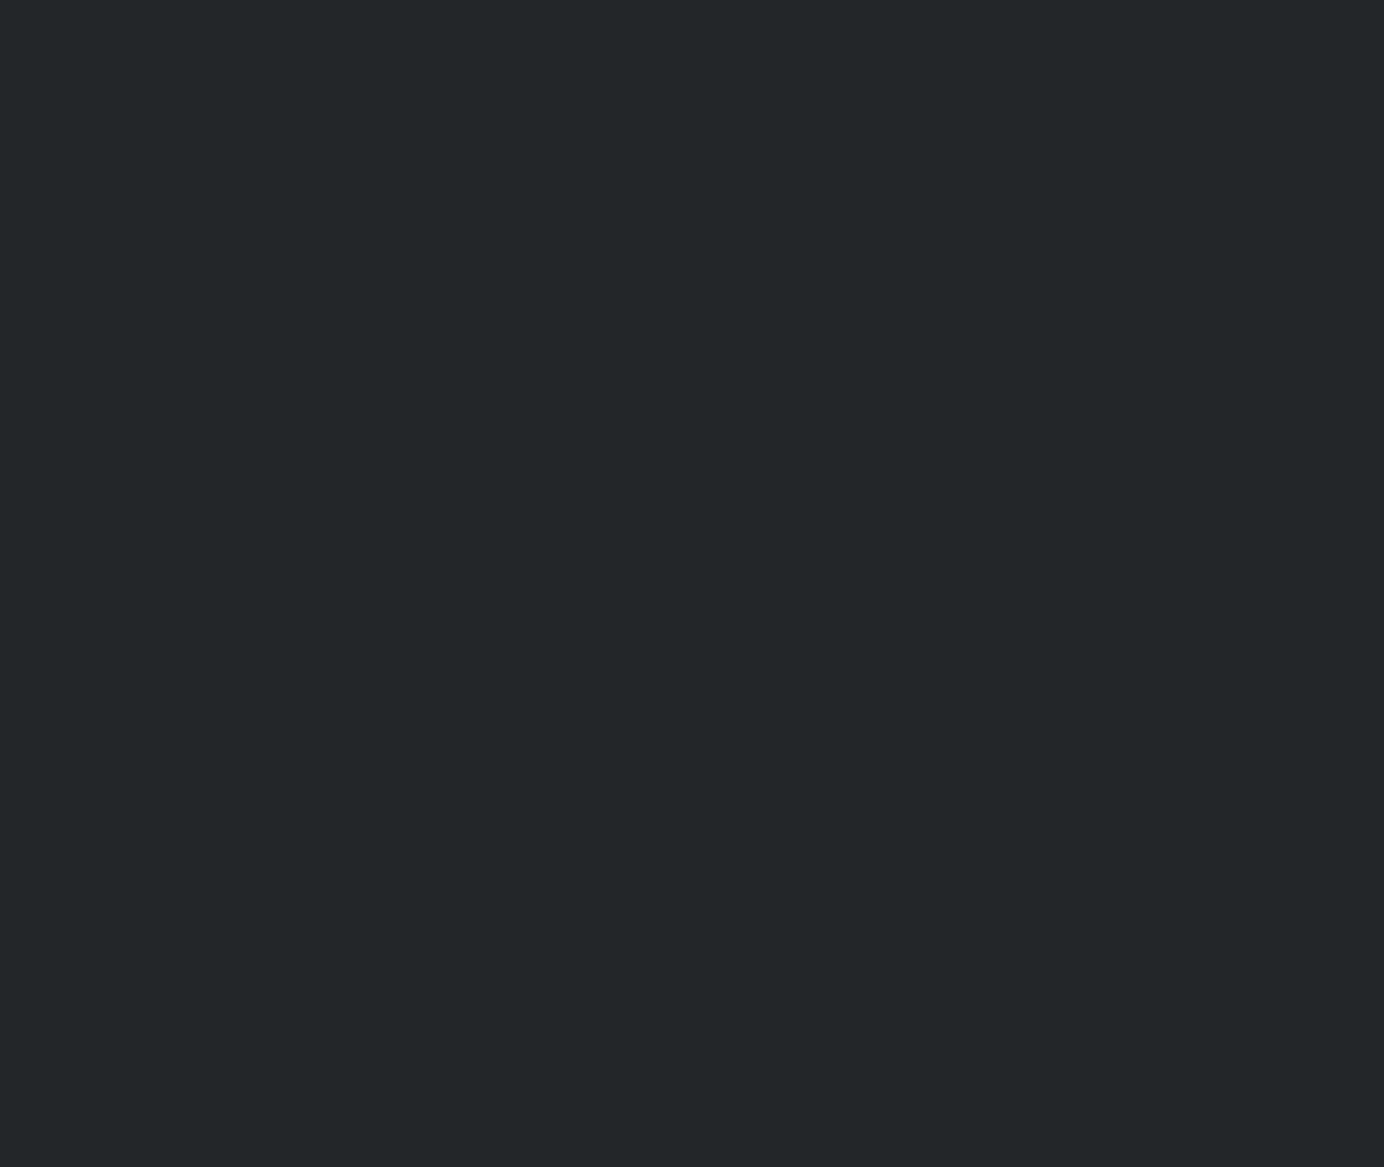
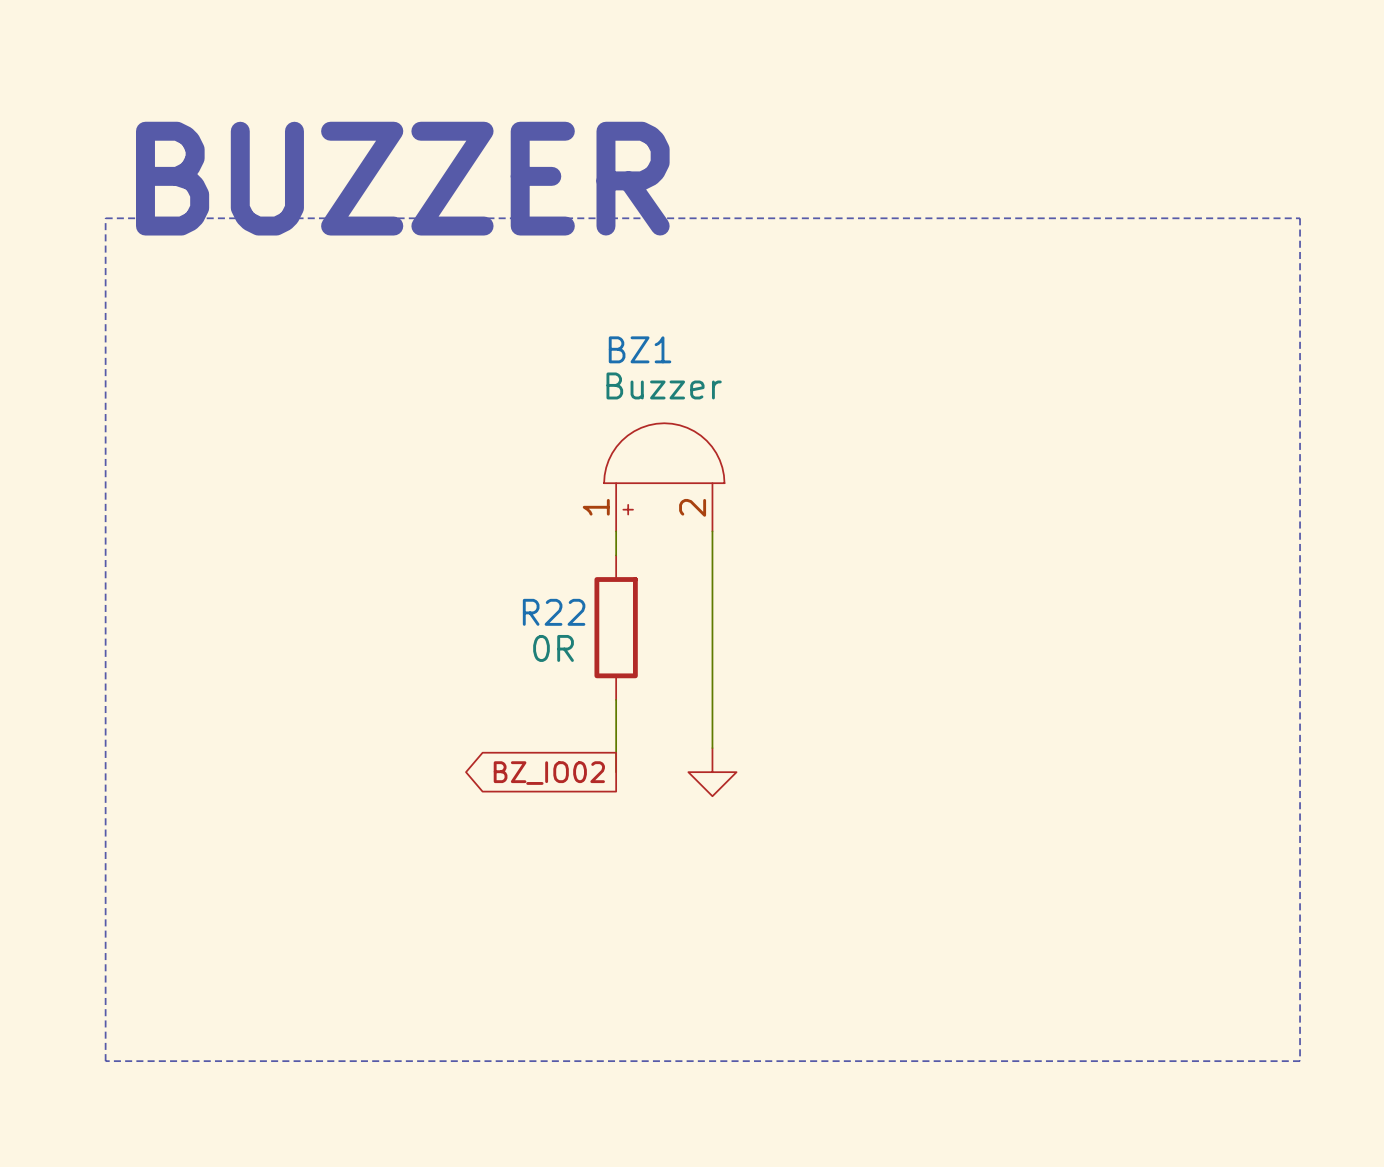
text: none -> BUZZER (402, 178)
line: none -> (105, 218) (1300, 218) (1300, 1061) (105, 1061) (105, 218)
BZ1: none -> Buzzer (664, 477)
wire: none -> (616, 531) (616, 555)
wire: none -> (712, 531) (712, 748)
R22: none -> 0R (616, 627)
wire: none -> (616, 699) (616, 772)
power symbol: none -> (712, 772)
global label: none -> BZ_IO02 (549, 773)

